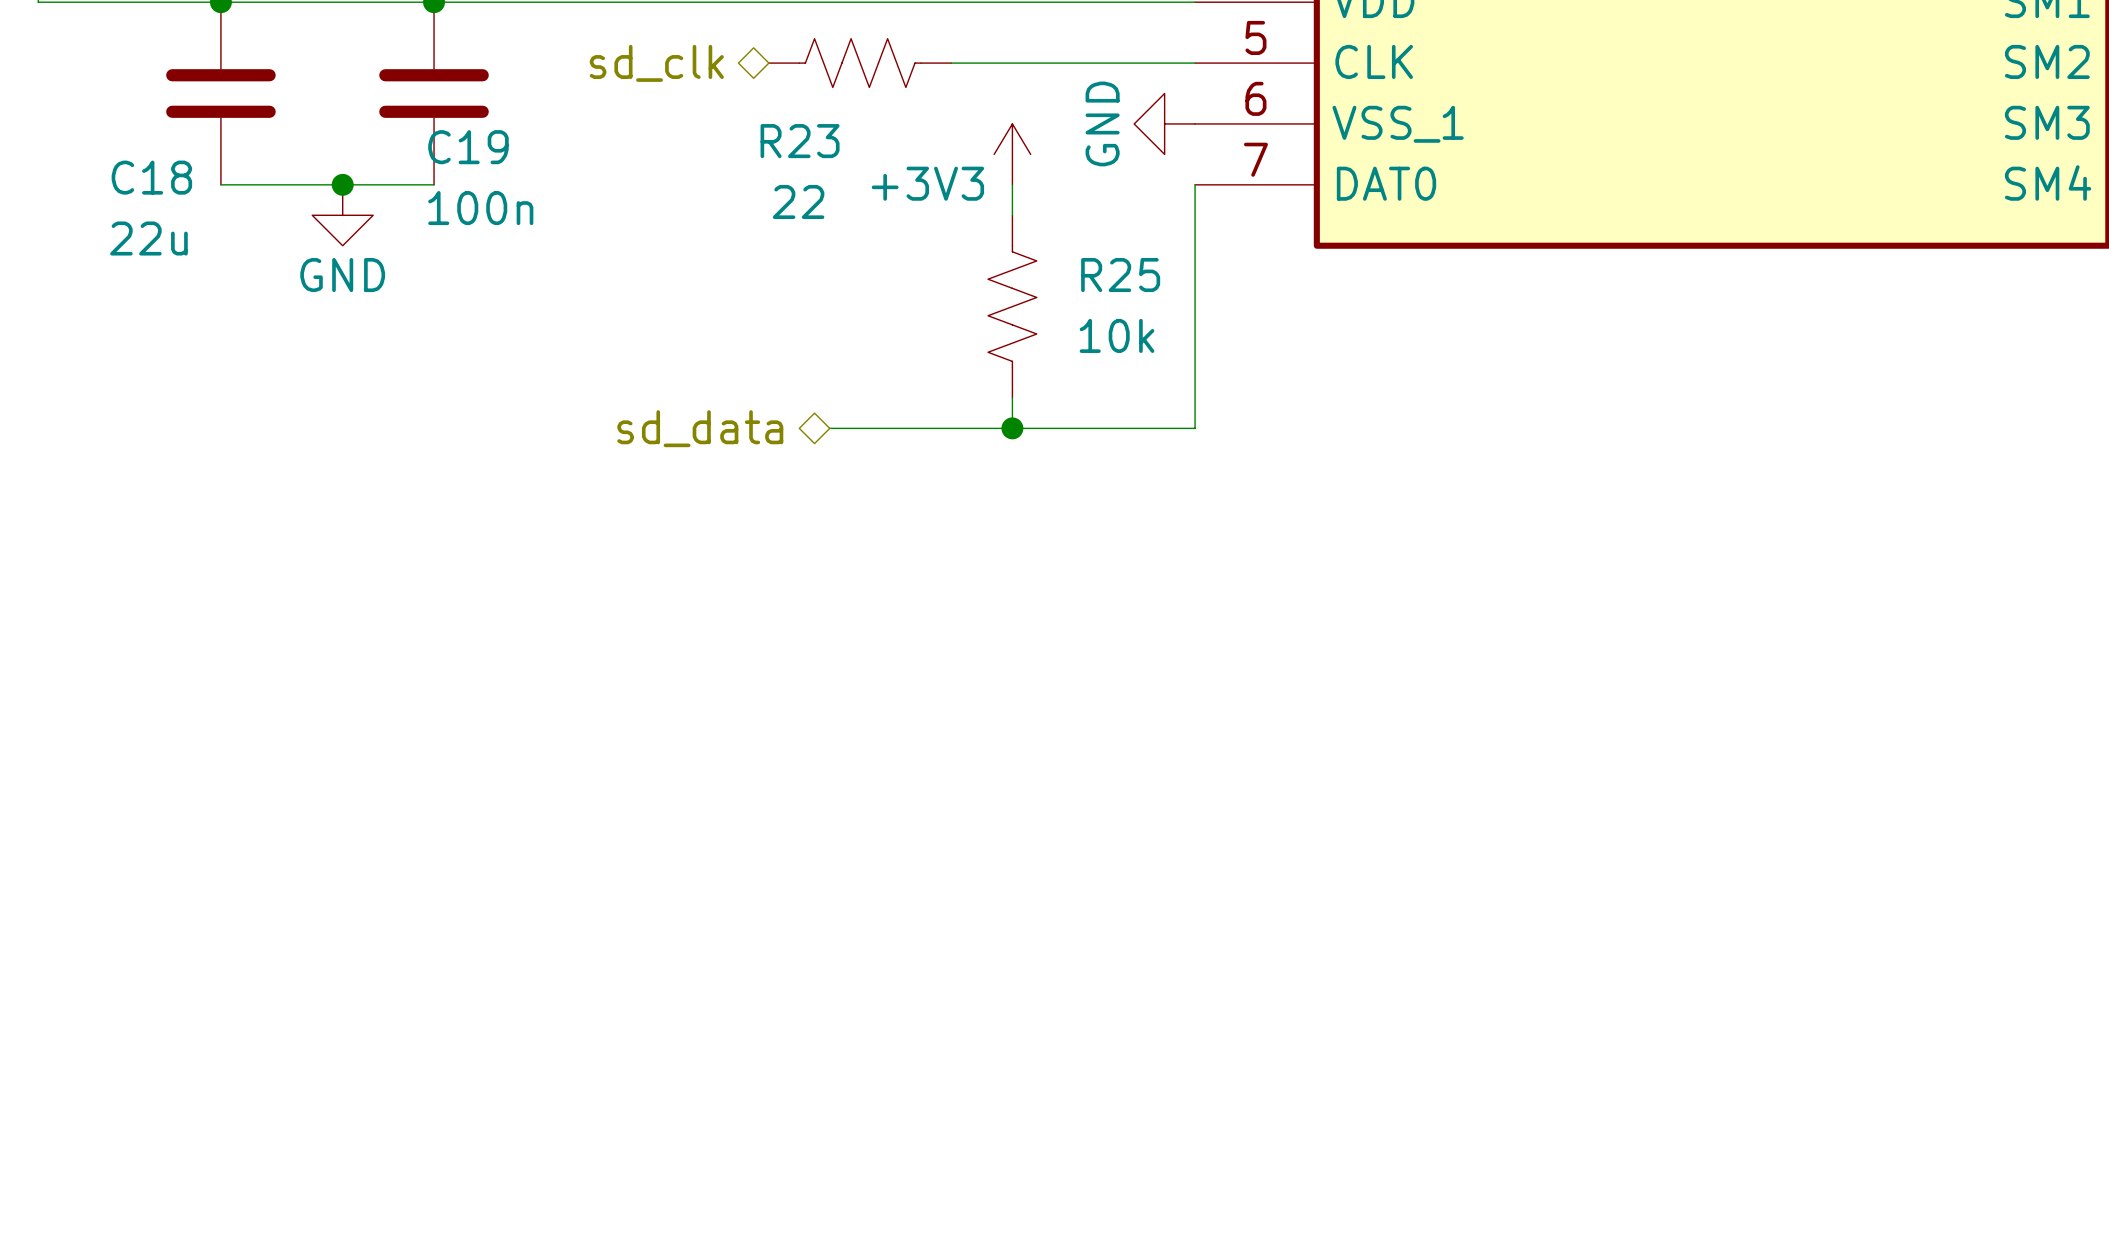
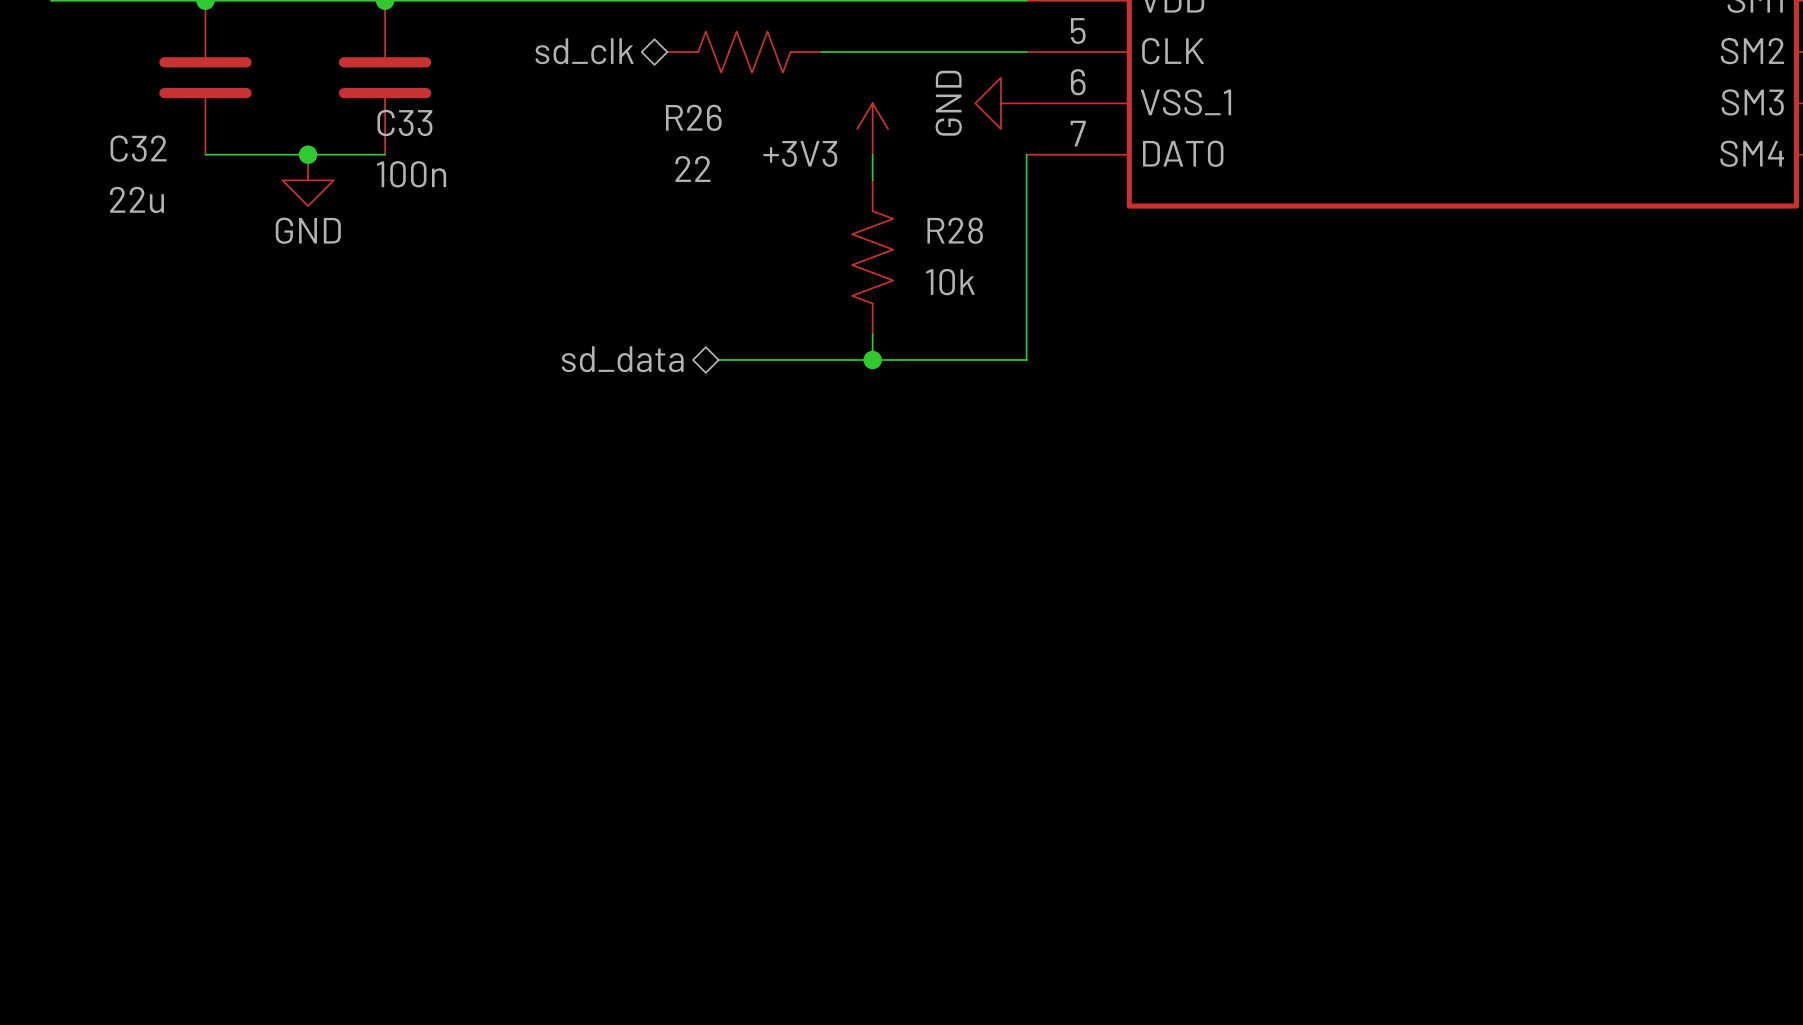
R23 name: R23 (800, 141) -> R26 (693, 117)
C19 name: C19 (468, 147) -> C33 (404, 122)
C18 name: C18 (151, 177) -> C32 (138, 148)
R25 name: R25 (1120, 275) -> R28 (955, 230)

